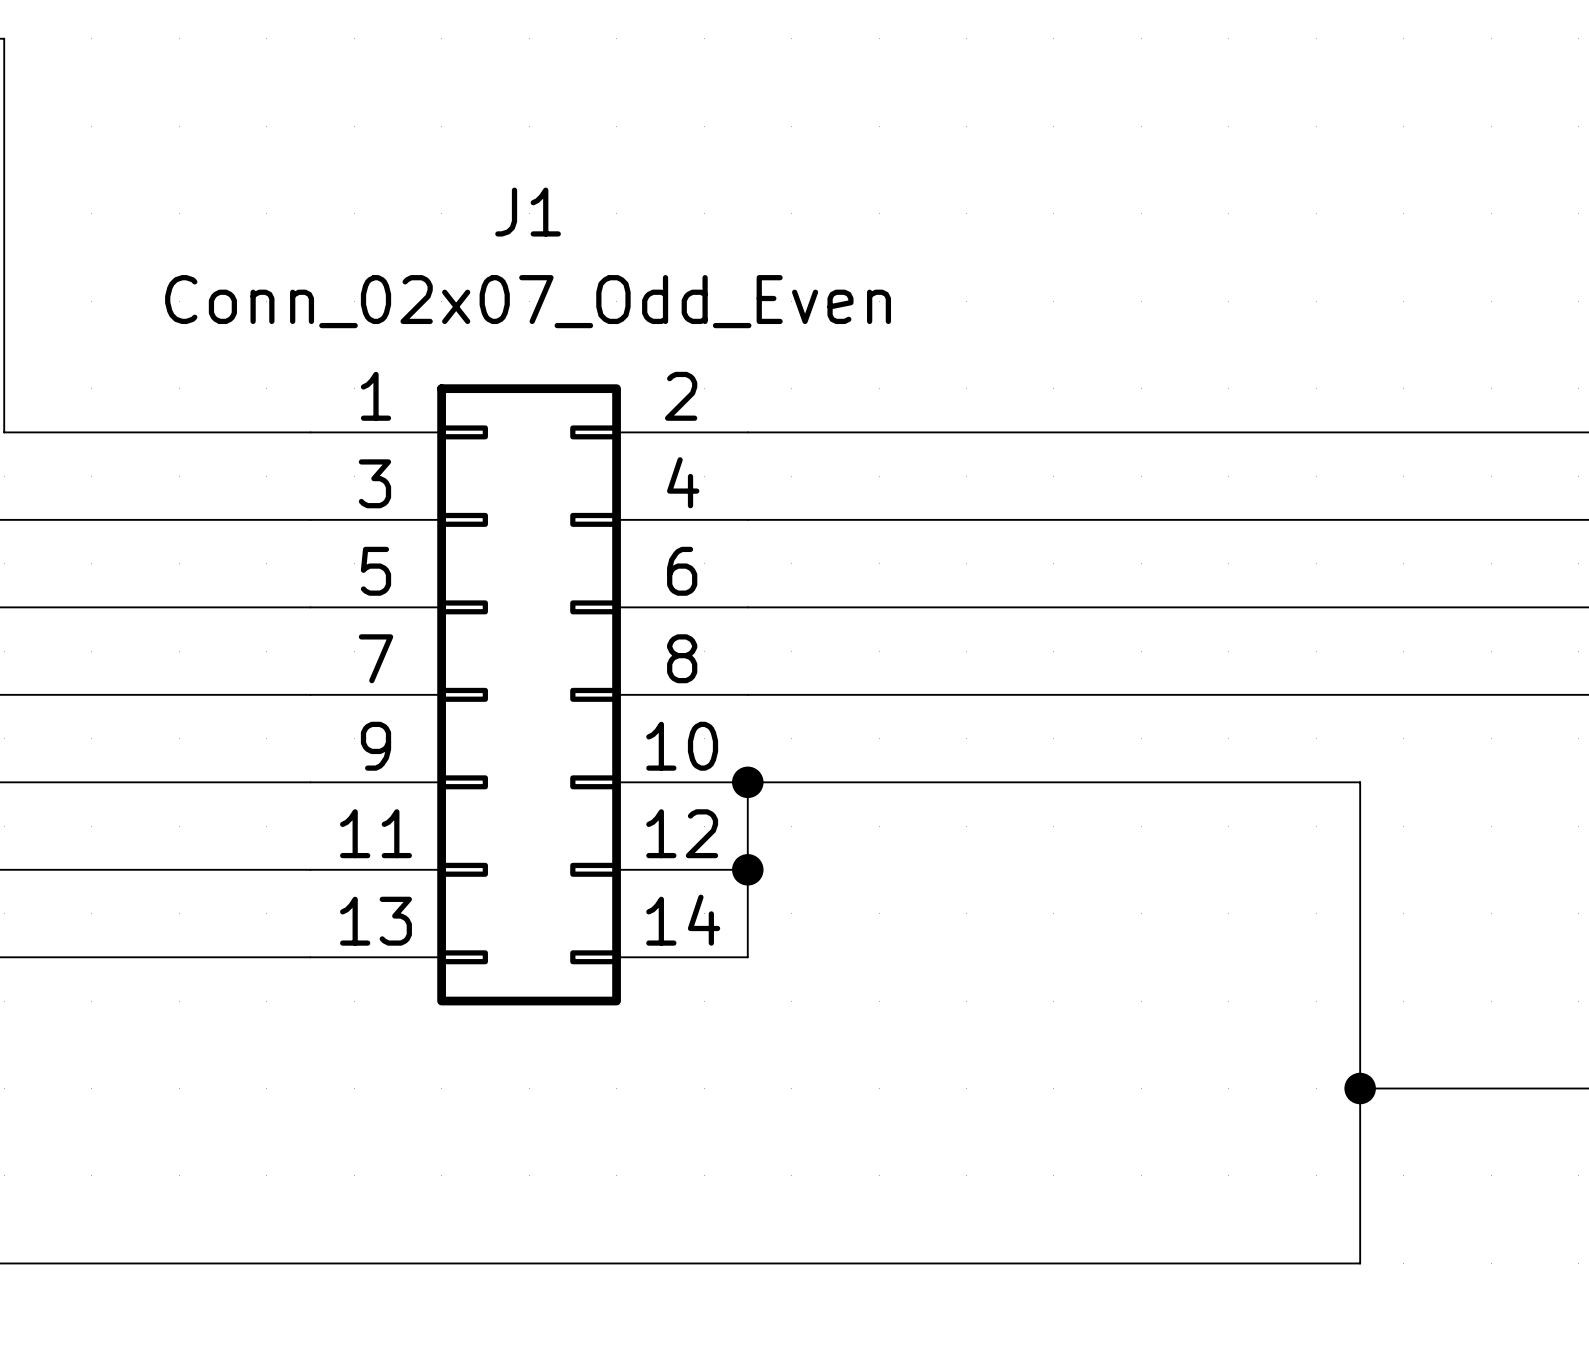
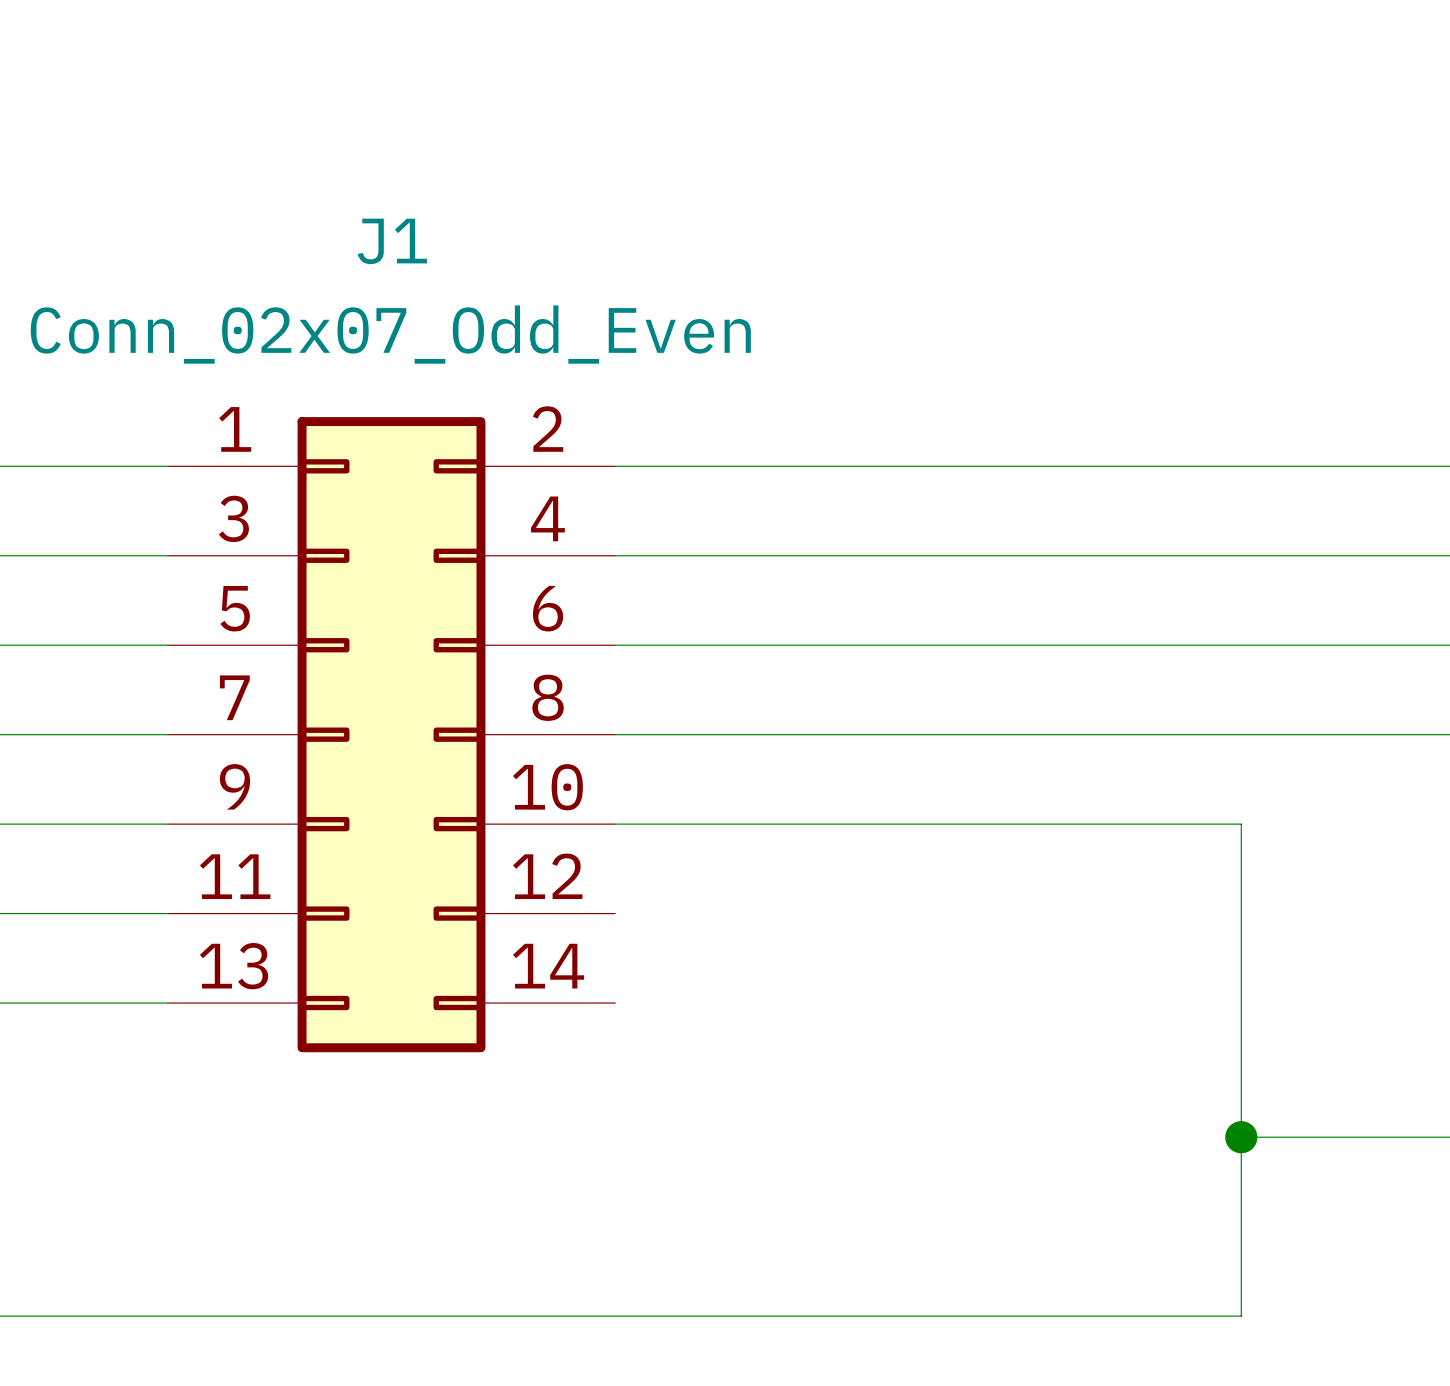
wire: (747, 782) (747, 957) -> none
junction: (747, 782) -> none
junction: (747, 869) -> none

